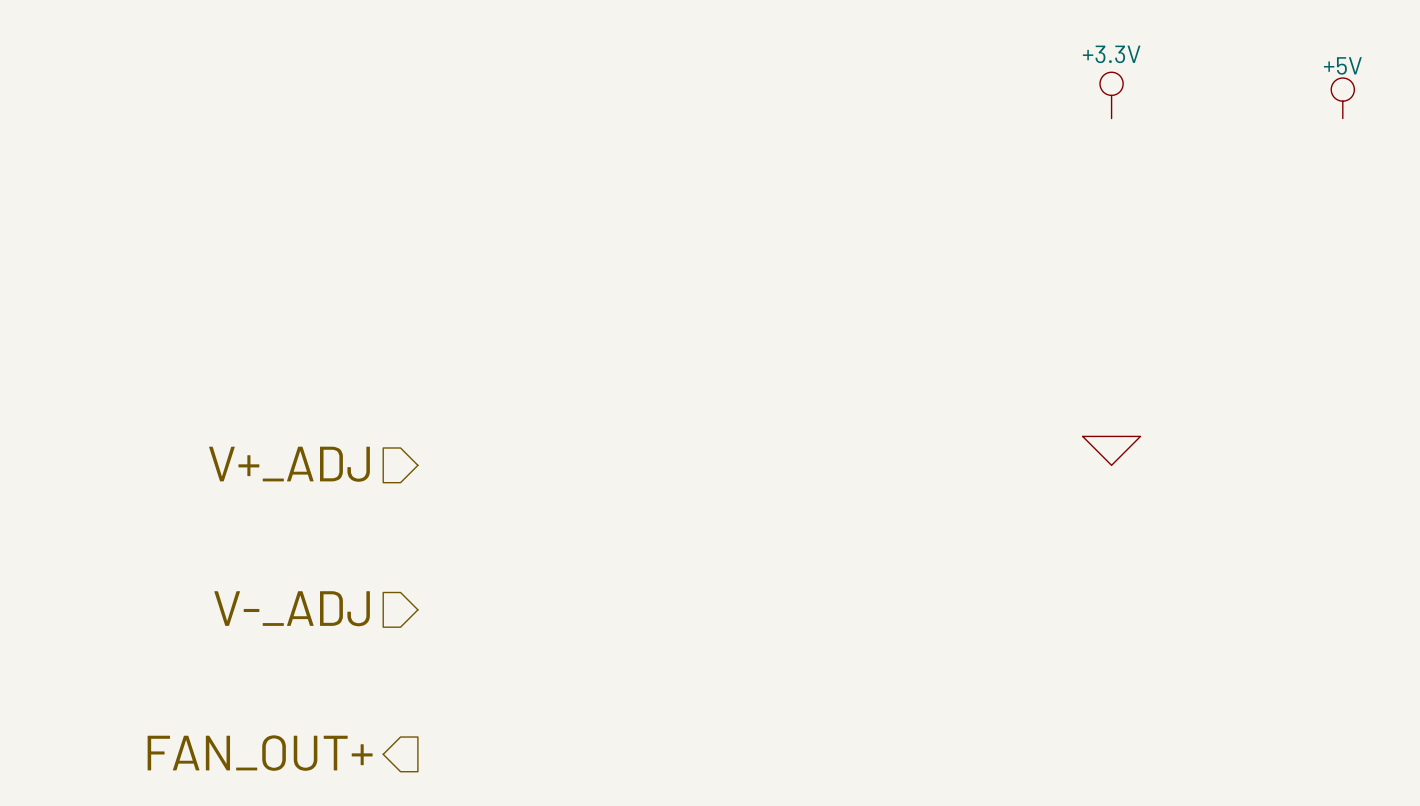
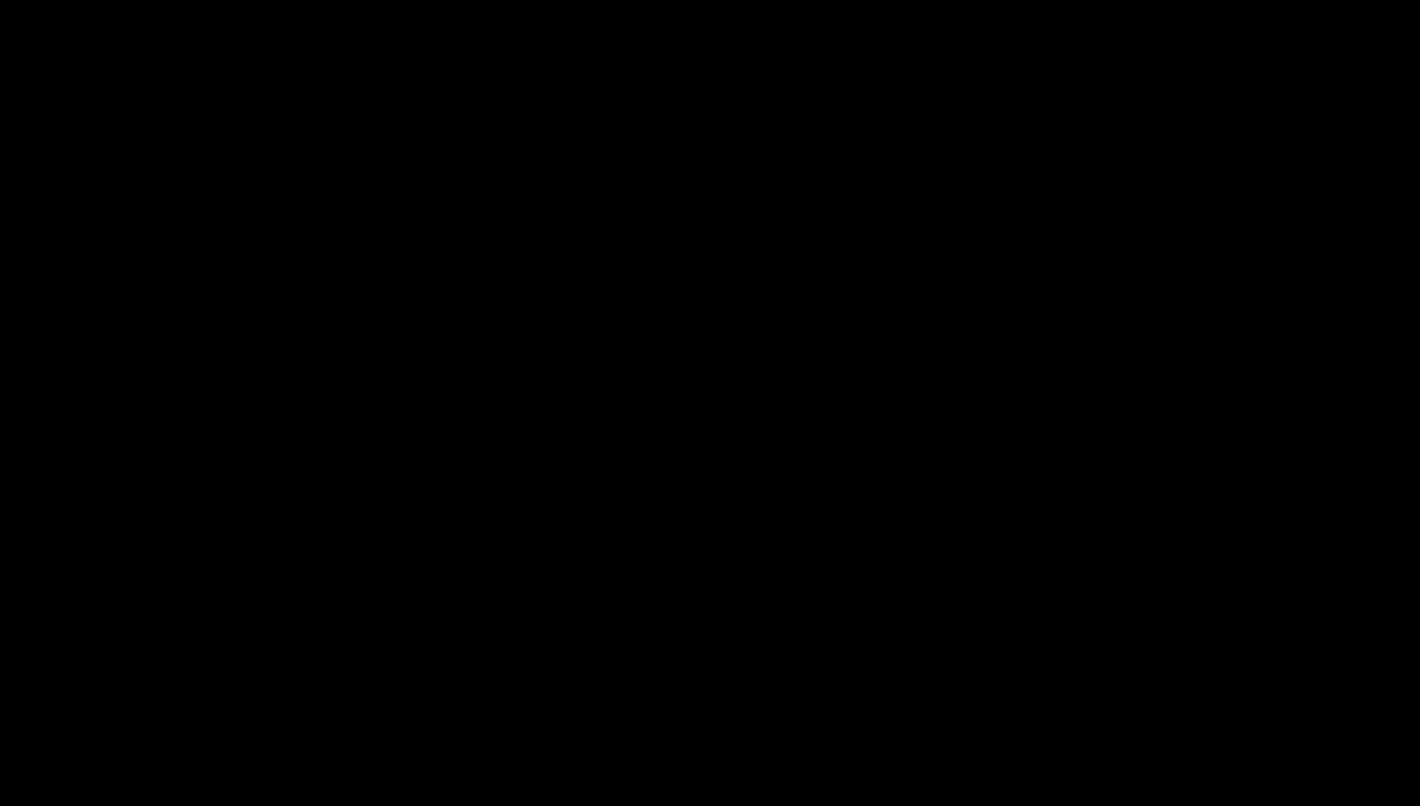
power symbol: +3.3V (1111, 95) -> none
power symbol: +5V (1342, 98) -> none
power symbol: (1111, 450) -> none
hierarchical label: V+_ADJ (289, 464) -> none
hierarchical label: V-_ADJ (292, 608) -> none
hierarchical label: FAN_OUT+ (260, 753) -> none

